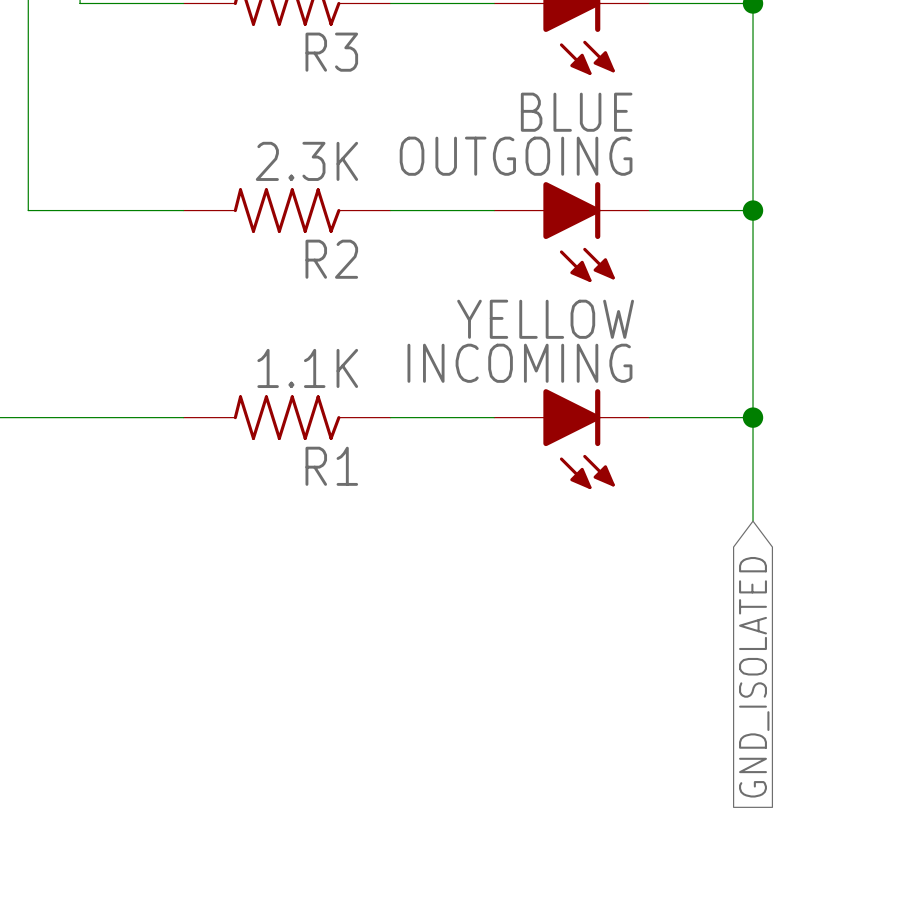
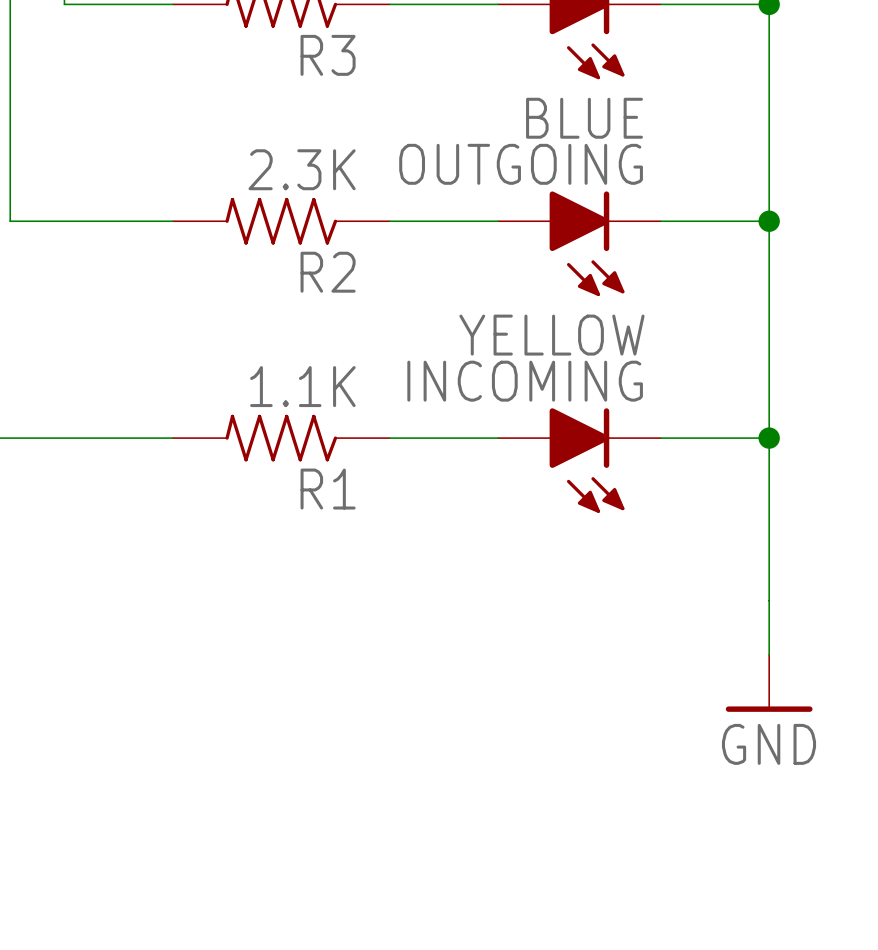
wire: none -> (769, 546) (769, 654)
power symbol: none -> GND (769, 683)
global label: GND_ISOLATED (754, 677) -> none

